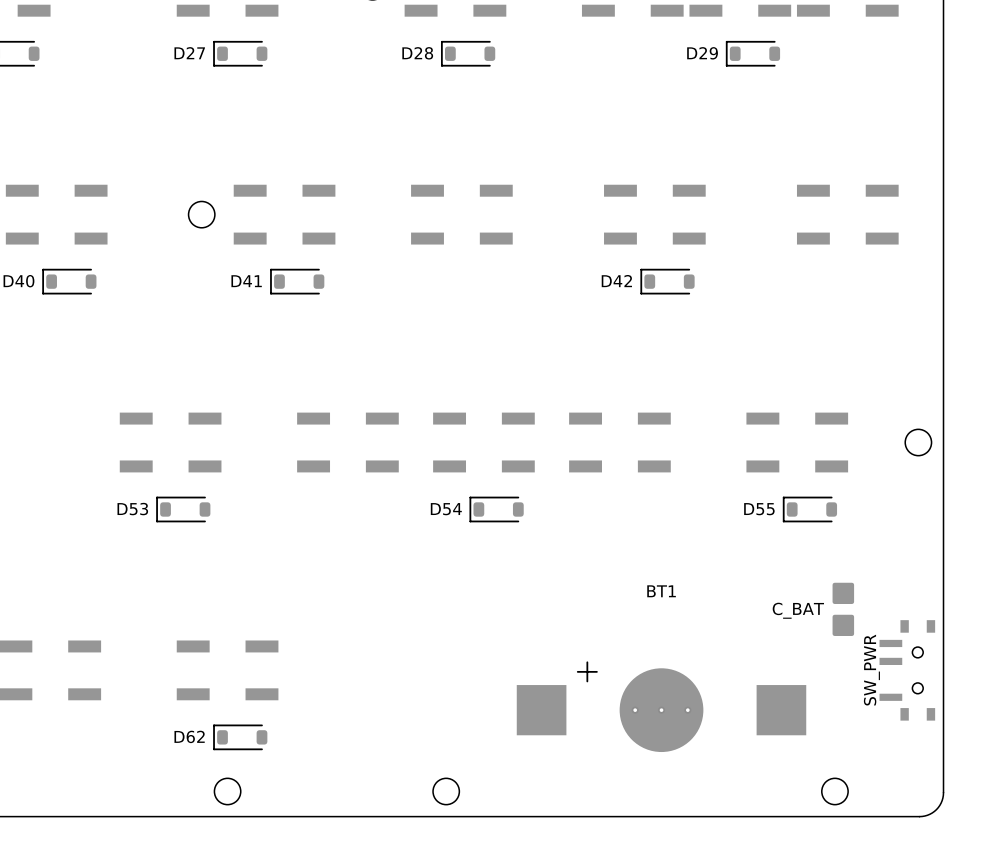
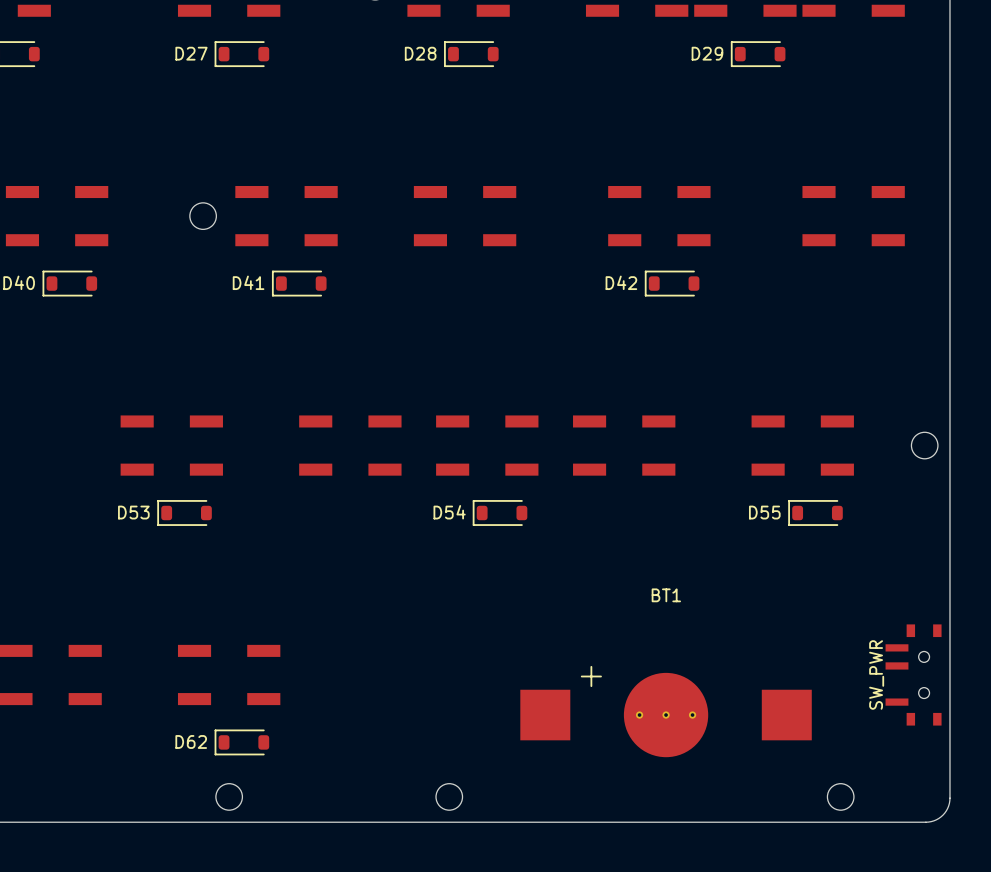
C_BAT: (843, 609) -> none

